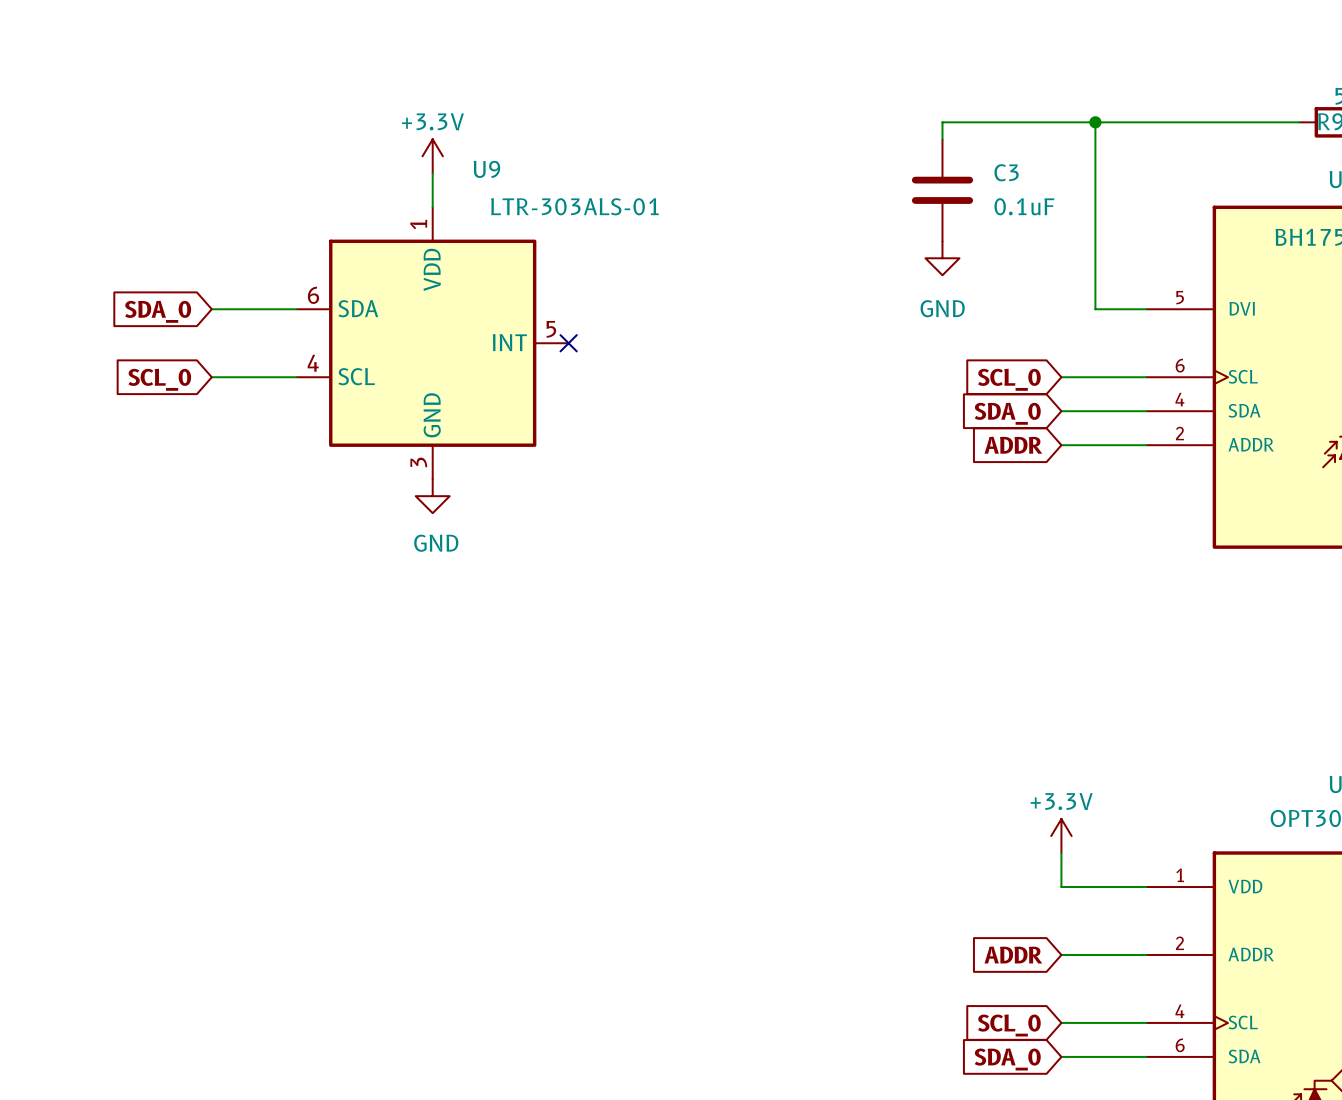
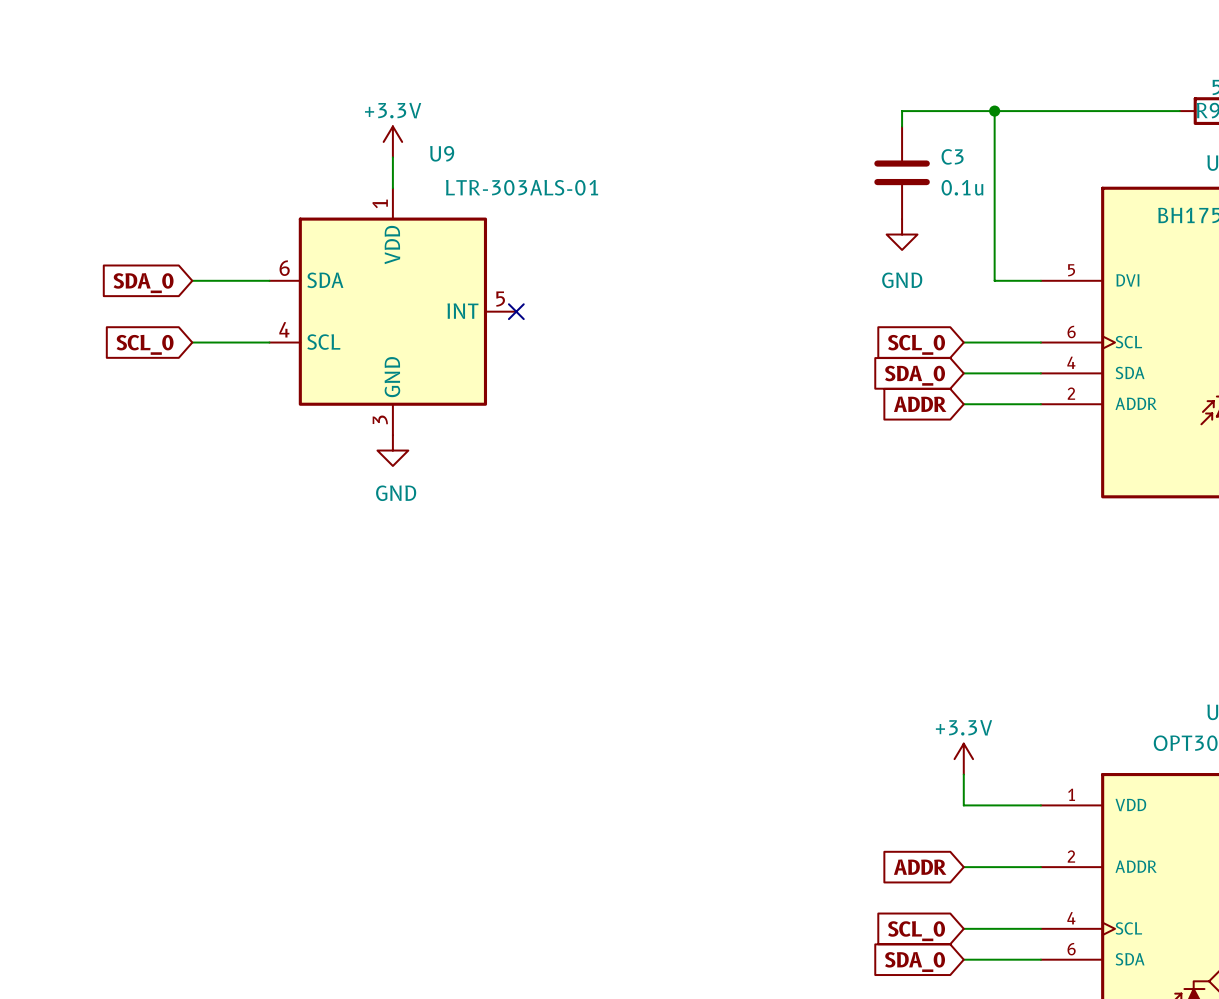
wire: (993, 122) (942, 122) (942, 139) -> (902, 111) (902, 126)
C3 name position: C3 (1006, 172) -> C3 (952, 156)
C3 position: (942, 190) -> (902, 172)
C3 value: 0.1uF (1024, 206) -> 0.1u (962, 187)
power symbol position: GND (942, 258) -> GND (902, 234)

